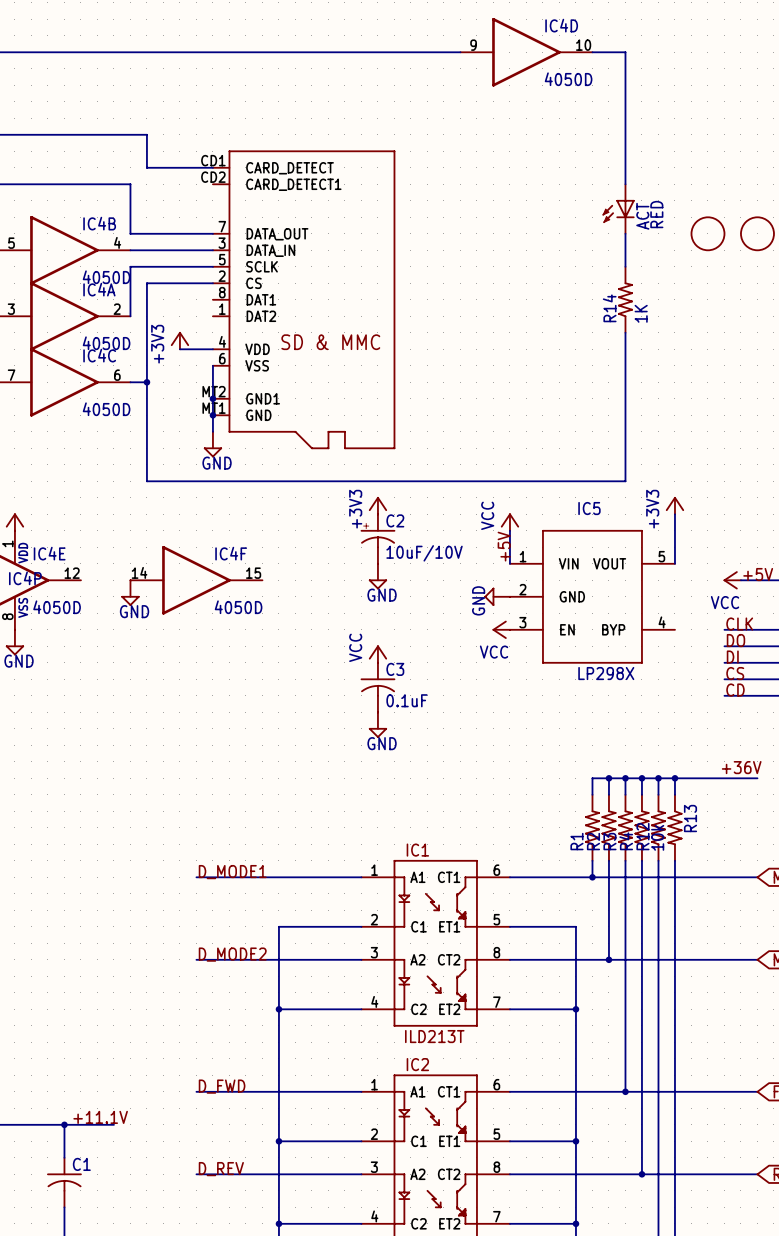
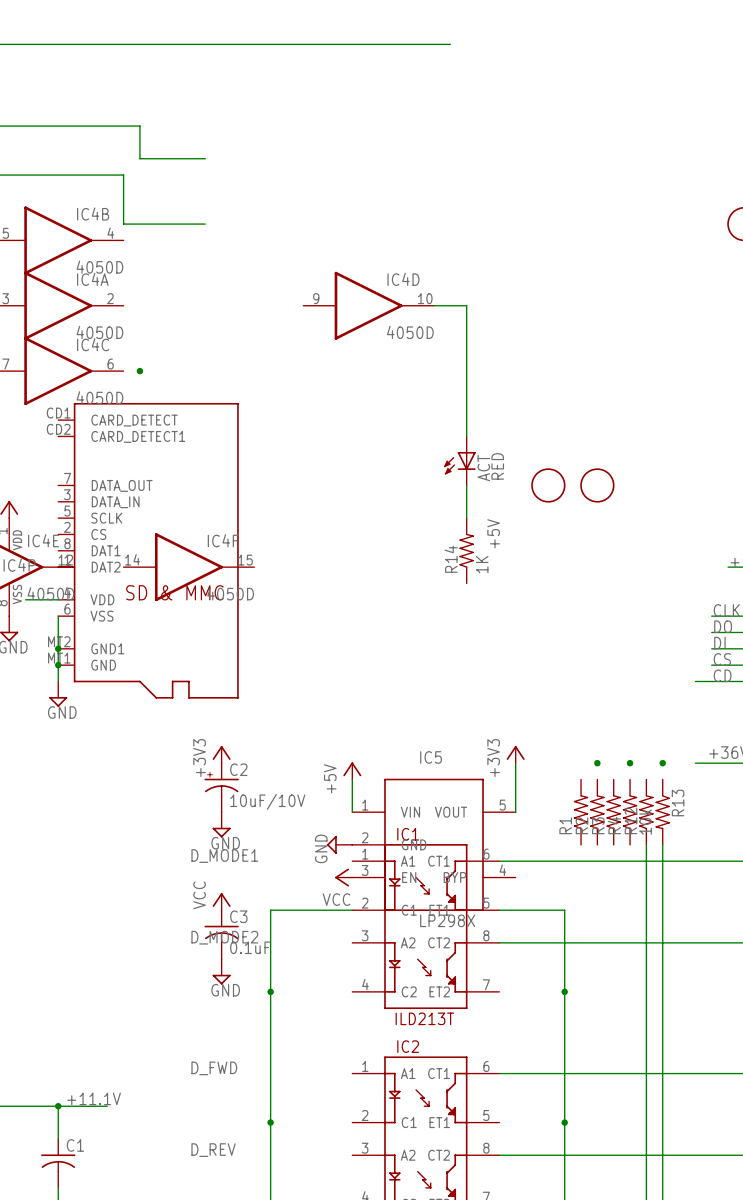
IC4D position: (526, 52) -> (368, 305)
wire: (592, 52) (625, 52) (625, 184) -> none
ACT: RED (618, 209) -> none
wire: (625, 233) (625, 266) -> none
part: (707, 233) -> none
wire: (130, 250) (212, 250) -> none
wire: (212, 266) (130, 266) (130, 316) -> none
wire: (212, 283) (146, 283) (146, 481) (625, 481) (625, 332) -> none
part: (304, 299) -> none
R14 position: (625, 299) -> (466, 550)
wire: none -> (434, 305) (466, 305) (466, 436)
power symbol: +3V3 (179, 340) -> none
wire: (179, 349) (212, 349) -> none
wire: (212, 365) (212, 431) -> none
wire: (130, 382) (146, 382) -> none
junction: (212, 398) -> none
junction: (212, 415) -> none
power symbol: GND (212, 444) -> none
ACT: none -> RED (459, 460)
part: none -> (548, 485)
part: none -> (597, 485)
power symbol: +3V3 (377, 505) -> none
power symbol: +3V3 (674, 505) -> none
wire: (674, 514) (674, 563) -> none
power symbol: VCC (509, 522) -> none
wire: (509, 530) (509, 563) -> (466, 485) (466, 518)
C2 position: (377, 539) -> (221, 787)
part: none -> (148, 550)
power symbol: GND (377, 576) -> none
power symbol: VCC (732, 580) -> none
power symbol: GND (130, 593) -> none
power symbol: GND (497, 596) -> none
IC5 position: (592, 596) -> (434, 844)
wire: none -> (25, 599) (58, 599)
wire: none -> (58, 616) (58, 681)
power symbol: VCC (501, 629) -> none
power symbol: VCC (377, 654) -> none
junction: none -> (58, 648)
junction: none -> (58, 665)
C3 position: (377, 687) -> (221, 934)
wire: none -> (695, 681) (711, 681)
power symbol: none -> GND (58, 694)
power symbol: GND (377, 725) -> none
power symbol: none -> +3V3 (221, 754)
power symbol: none -> +3V3 (515, 754)
wire: none -> (515, 763) (515, 812)
wire: (608, 778) (608, 794) -> none
wire: (625, 778) (625, 794) -> none
junction: (625, 778) -> none
wire: (641, 778) (641, 794) -> none
wire: (658, 778) (658, 794) -> none
junction: (658, 778) -> none
wire: (674, 778) (674, 794) -> none
wire: (707, 778) (592, 778) (592, 794) -> none
power symbol: none -> +5V (352, 770)
wire: none -> (352, 779) (352, 812)
power symbol: none -> GND (221, 824)
power symbol: none -> GND (339, 844)
wire: (592, 860) (592, 877) -> none
wire: (608, 860) (608, 959) -> none
wire: (625, 860) (625, 1091) -> none
wire: (641, 860) (641, 1174) -> none
wire: (196, 877) (361, 877) -> none
junction: (592, 877) -> none
power symbol: none -> VCC (343, 877)
power symbol: none -> VCC (221, 901)
wire: (196, 959) (361, 959) -> none
junction: (608, 959) -> none
power symbol: none -> GND (221, 971)
wire: (278, 1009) (361, 1009) -> none
wire: (509, 1009) (575, 1009) -> none
wire: (196, 1091) (361, 1091) -> none
junction: (625, 1091) -> none
wire: (278, 1141) (361, 1141) -> none
wire: (509, 1141) (575, 1141) -> none
wire: (196, 1174) (361, 1174) -> none
junction: (641, 1174) -> none

